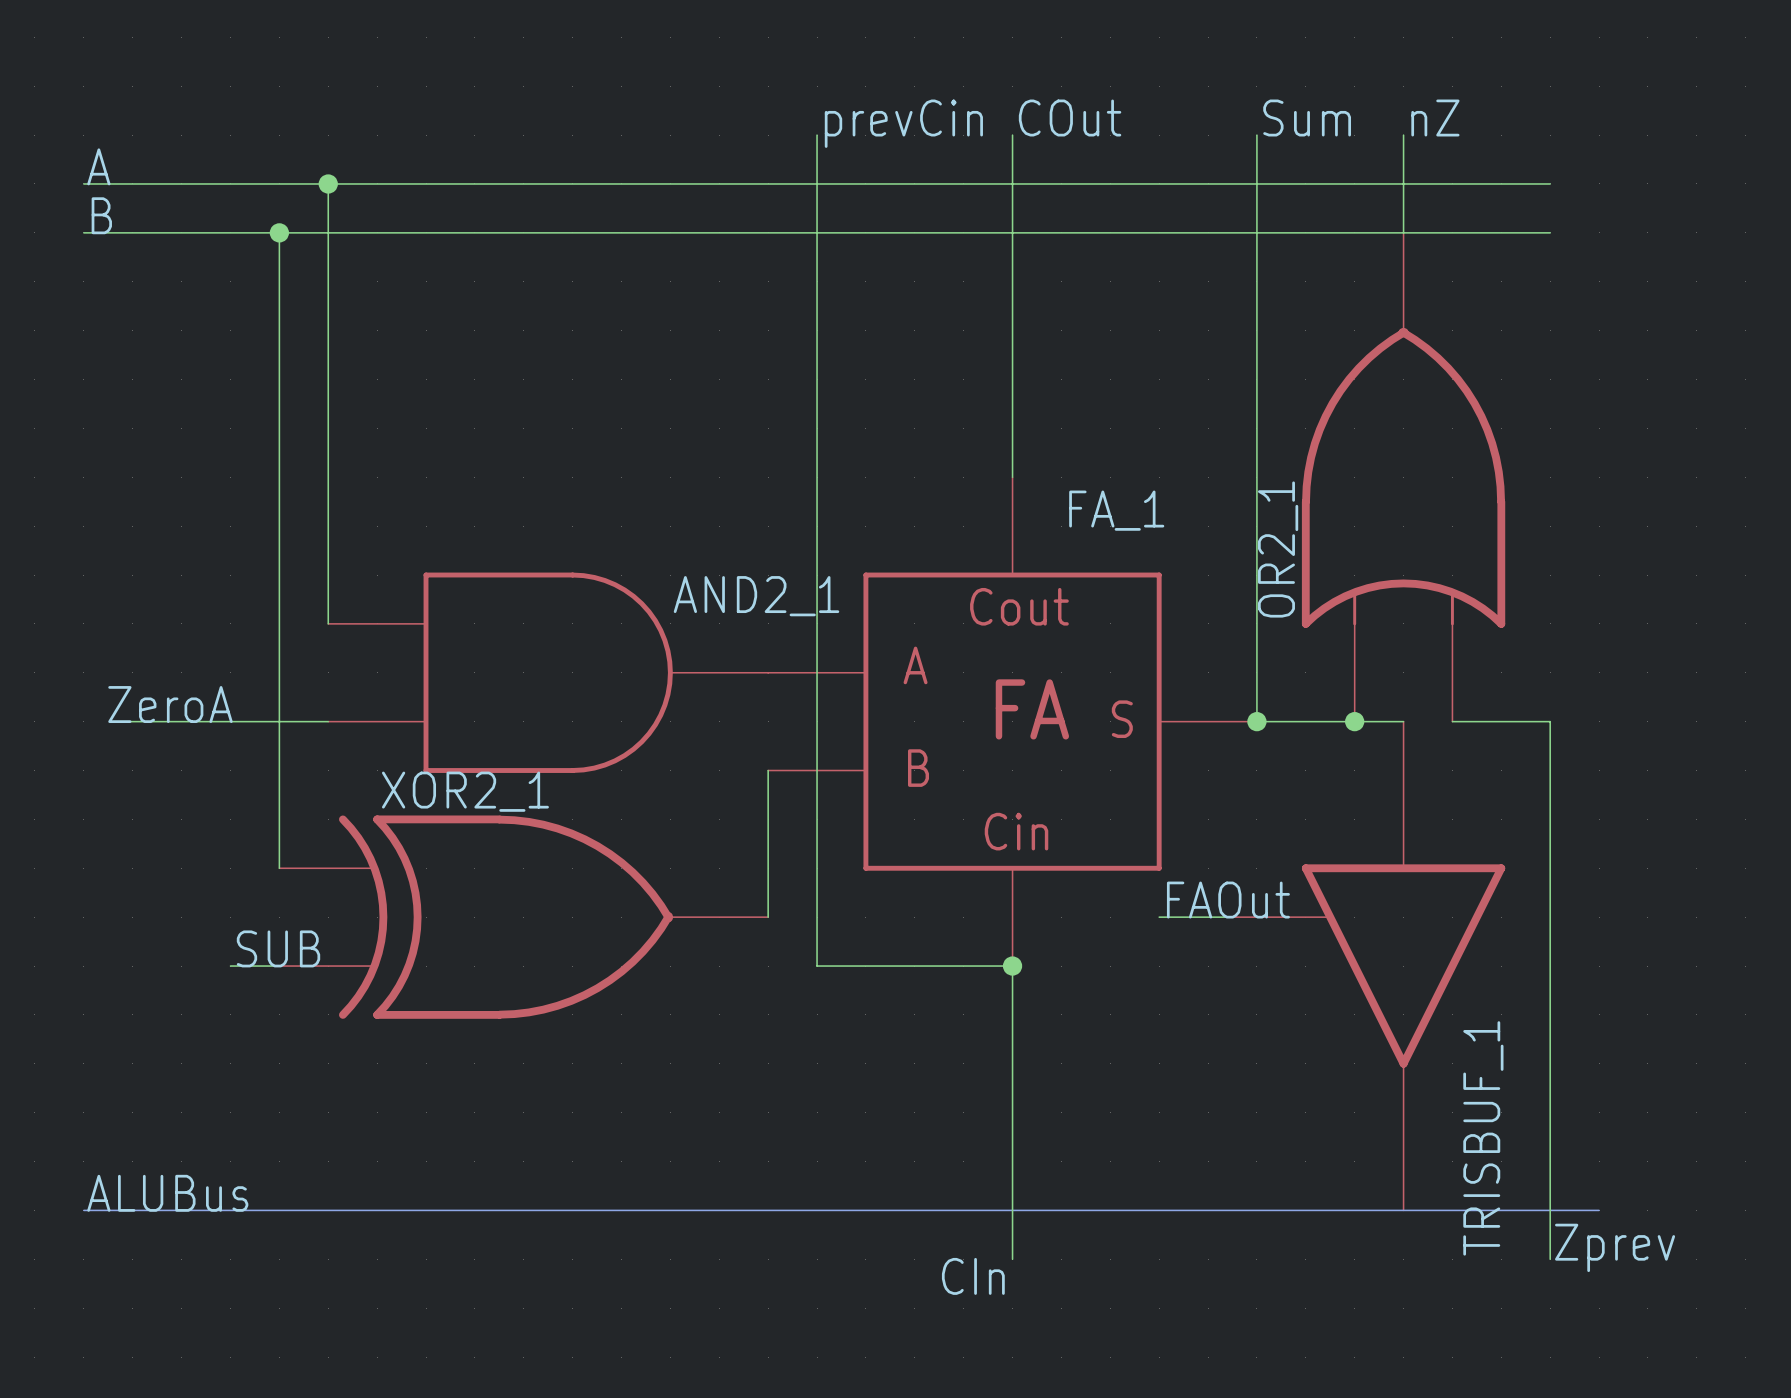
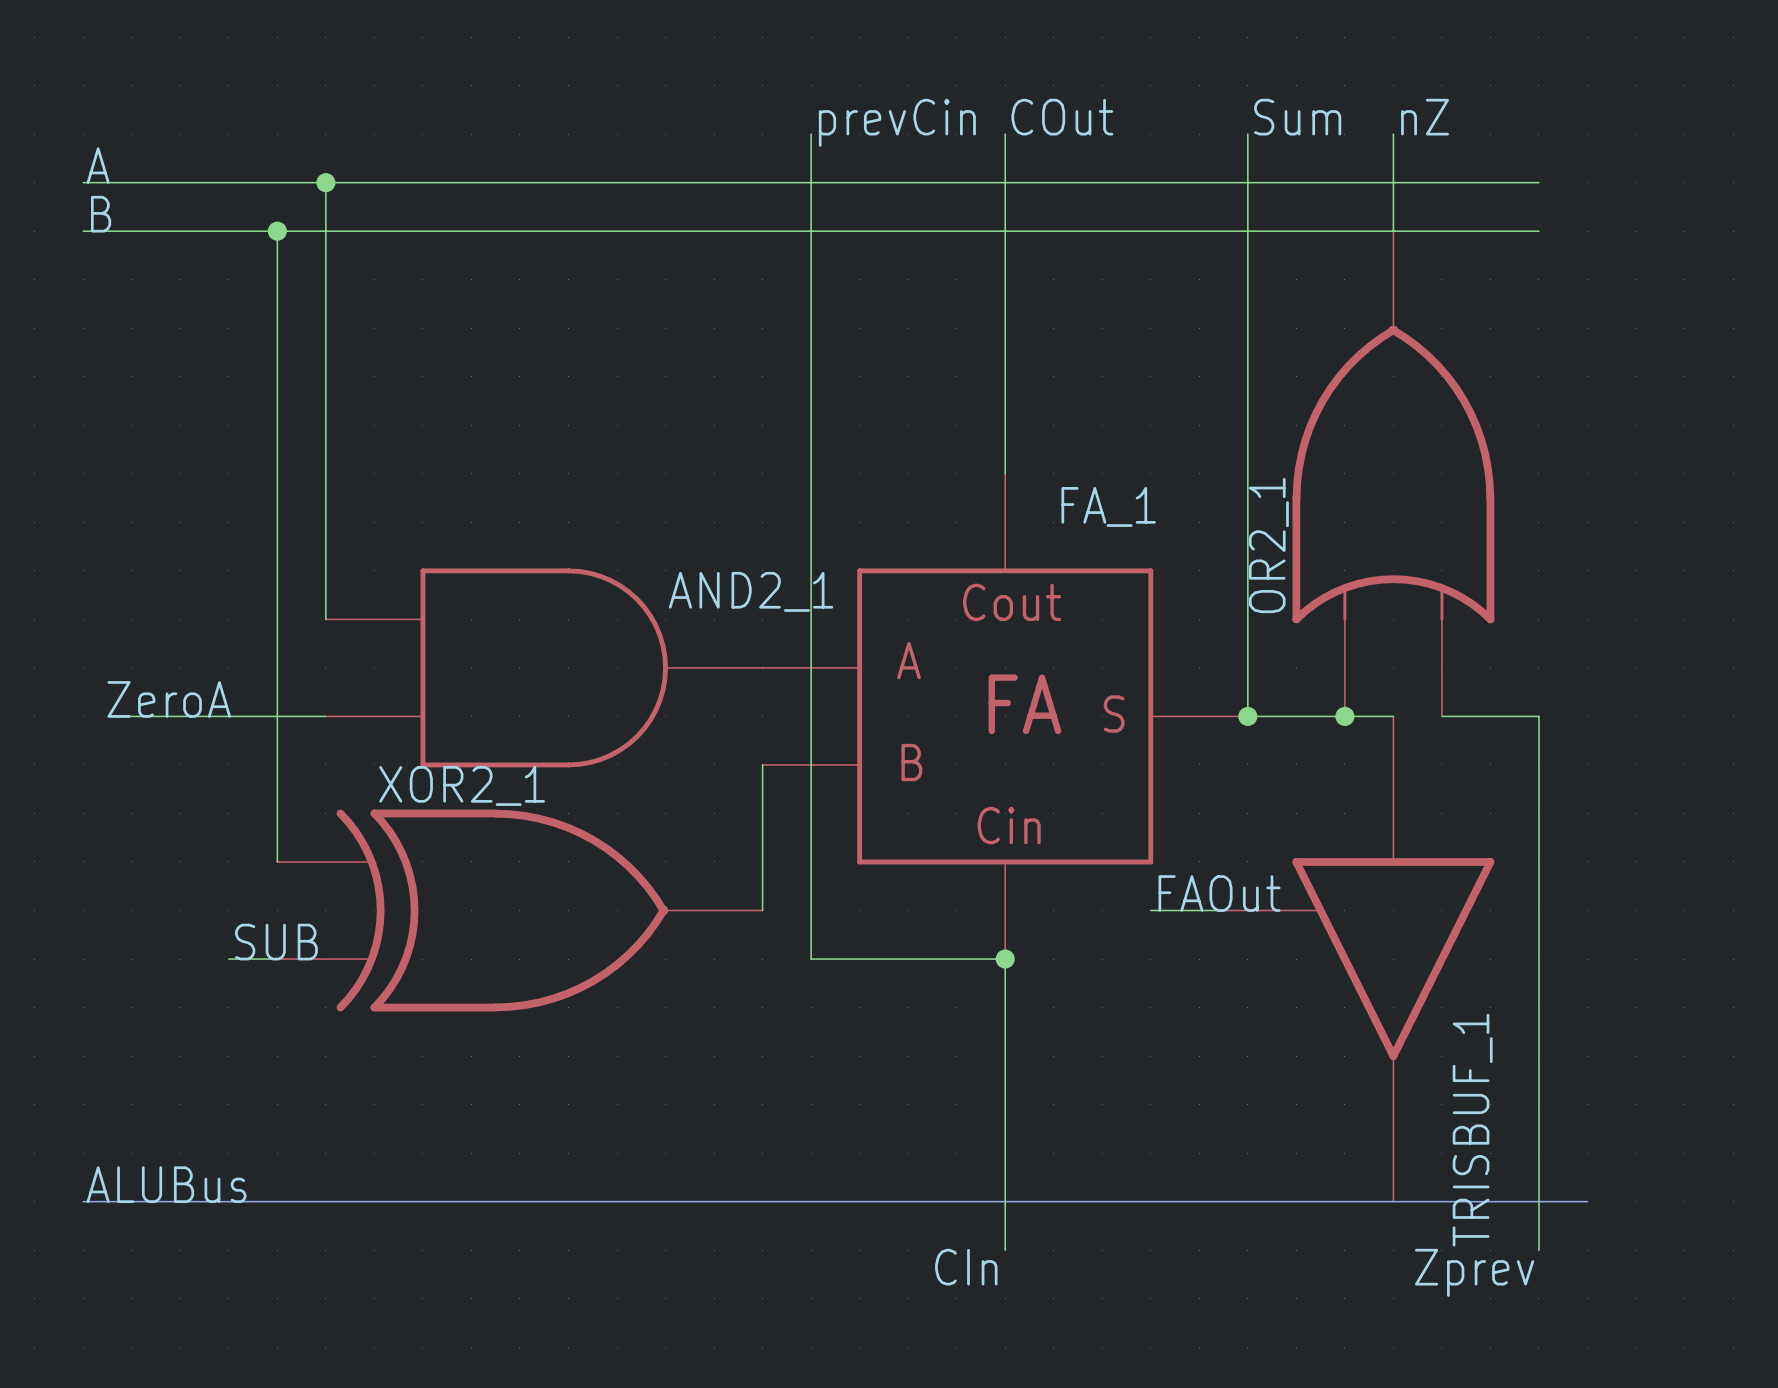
text position: Zprev (1615, 1247) -> Zprev (1474, 1272)

